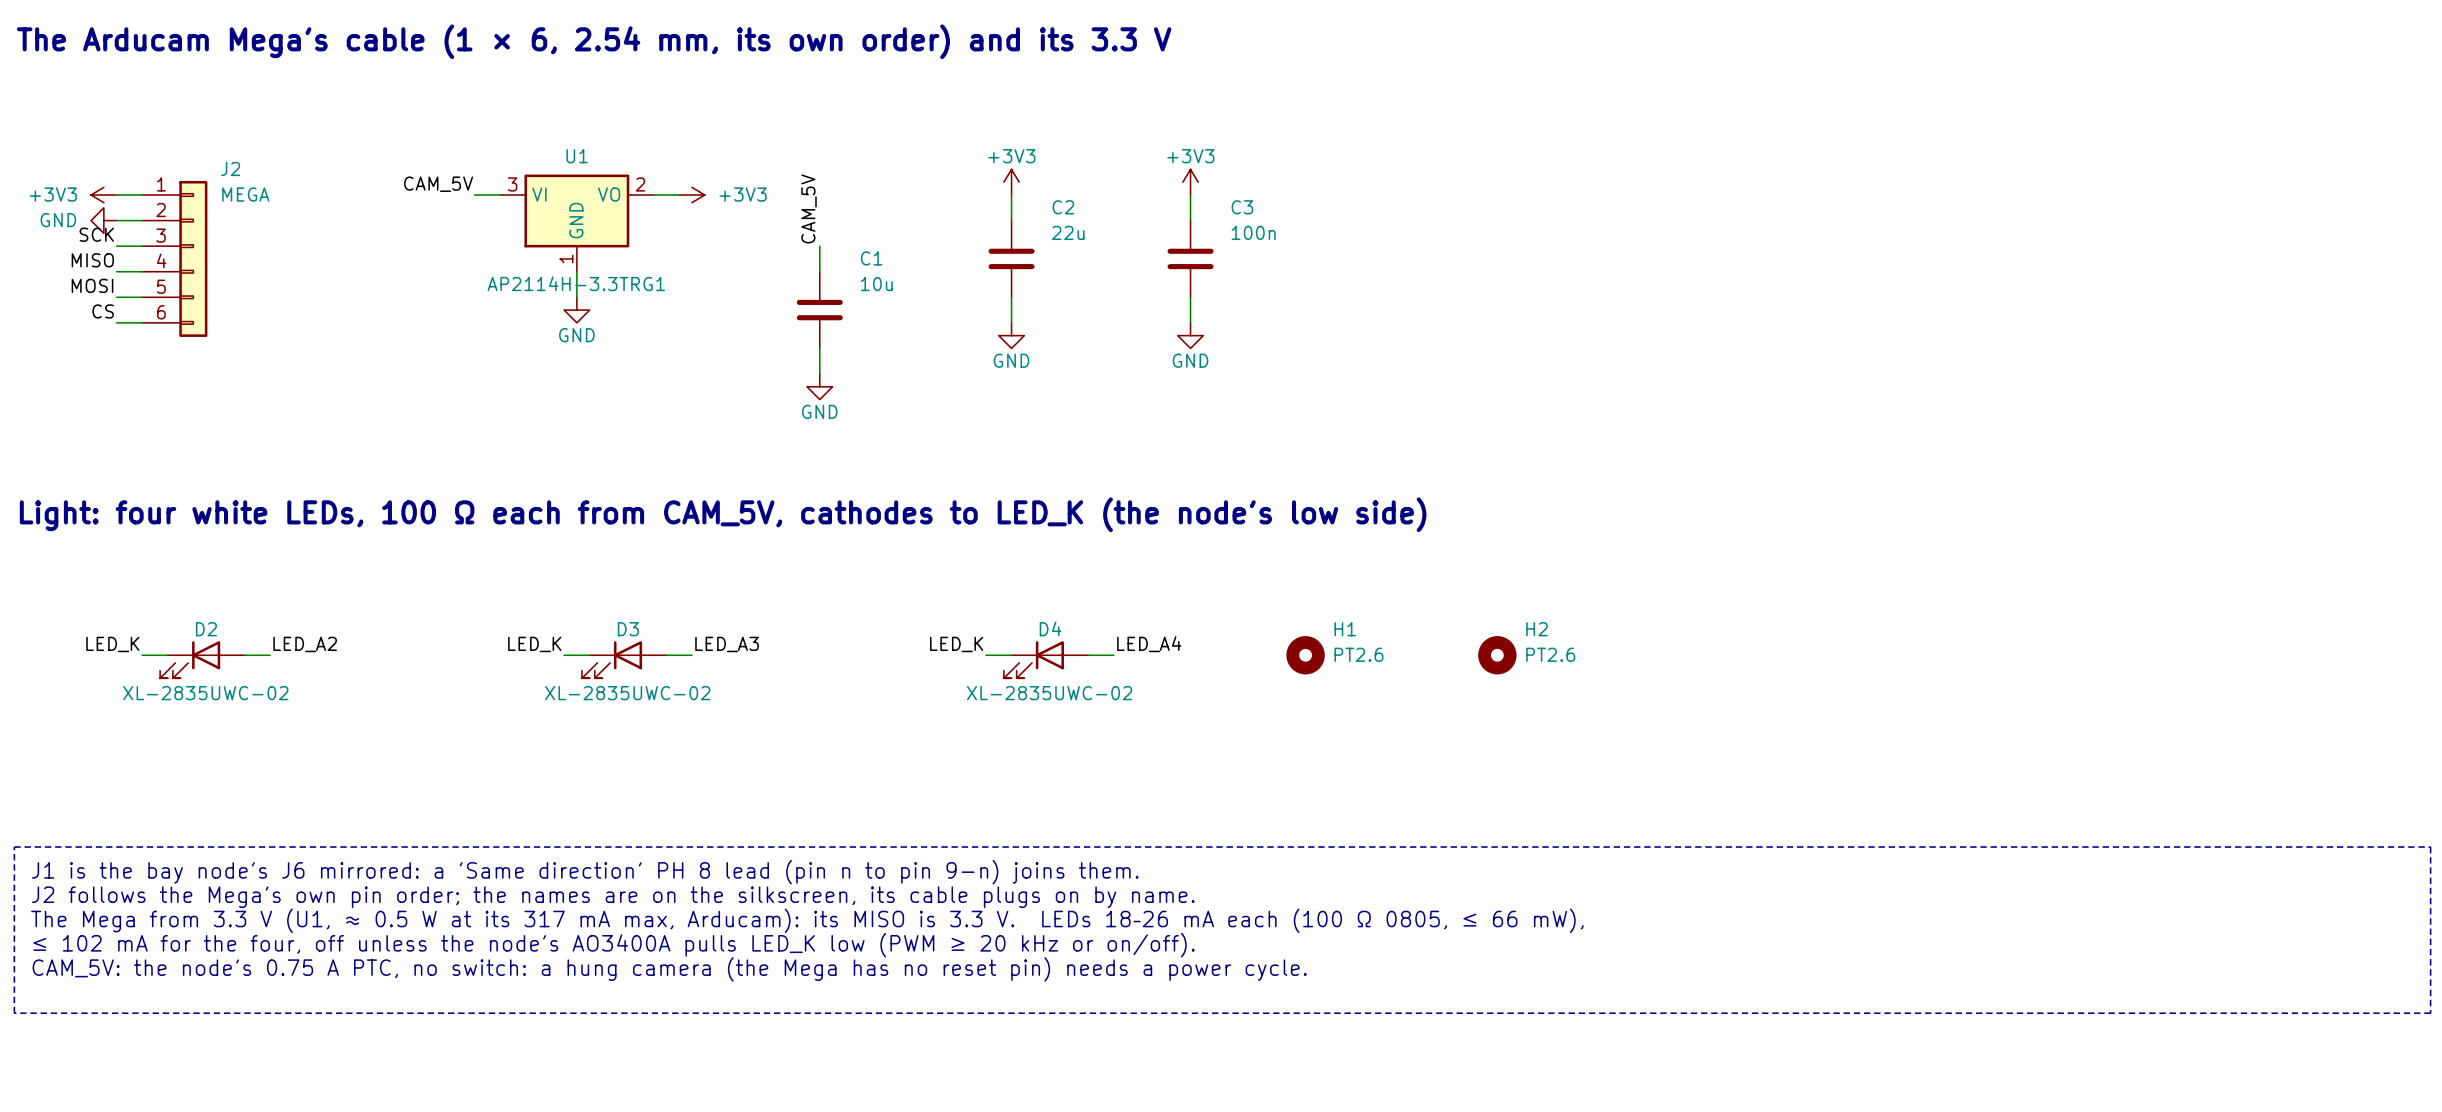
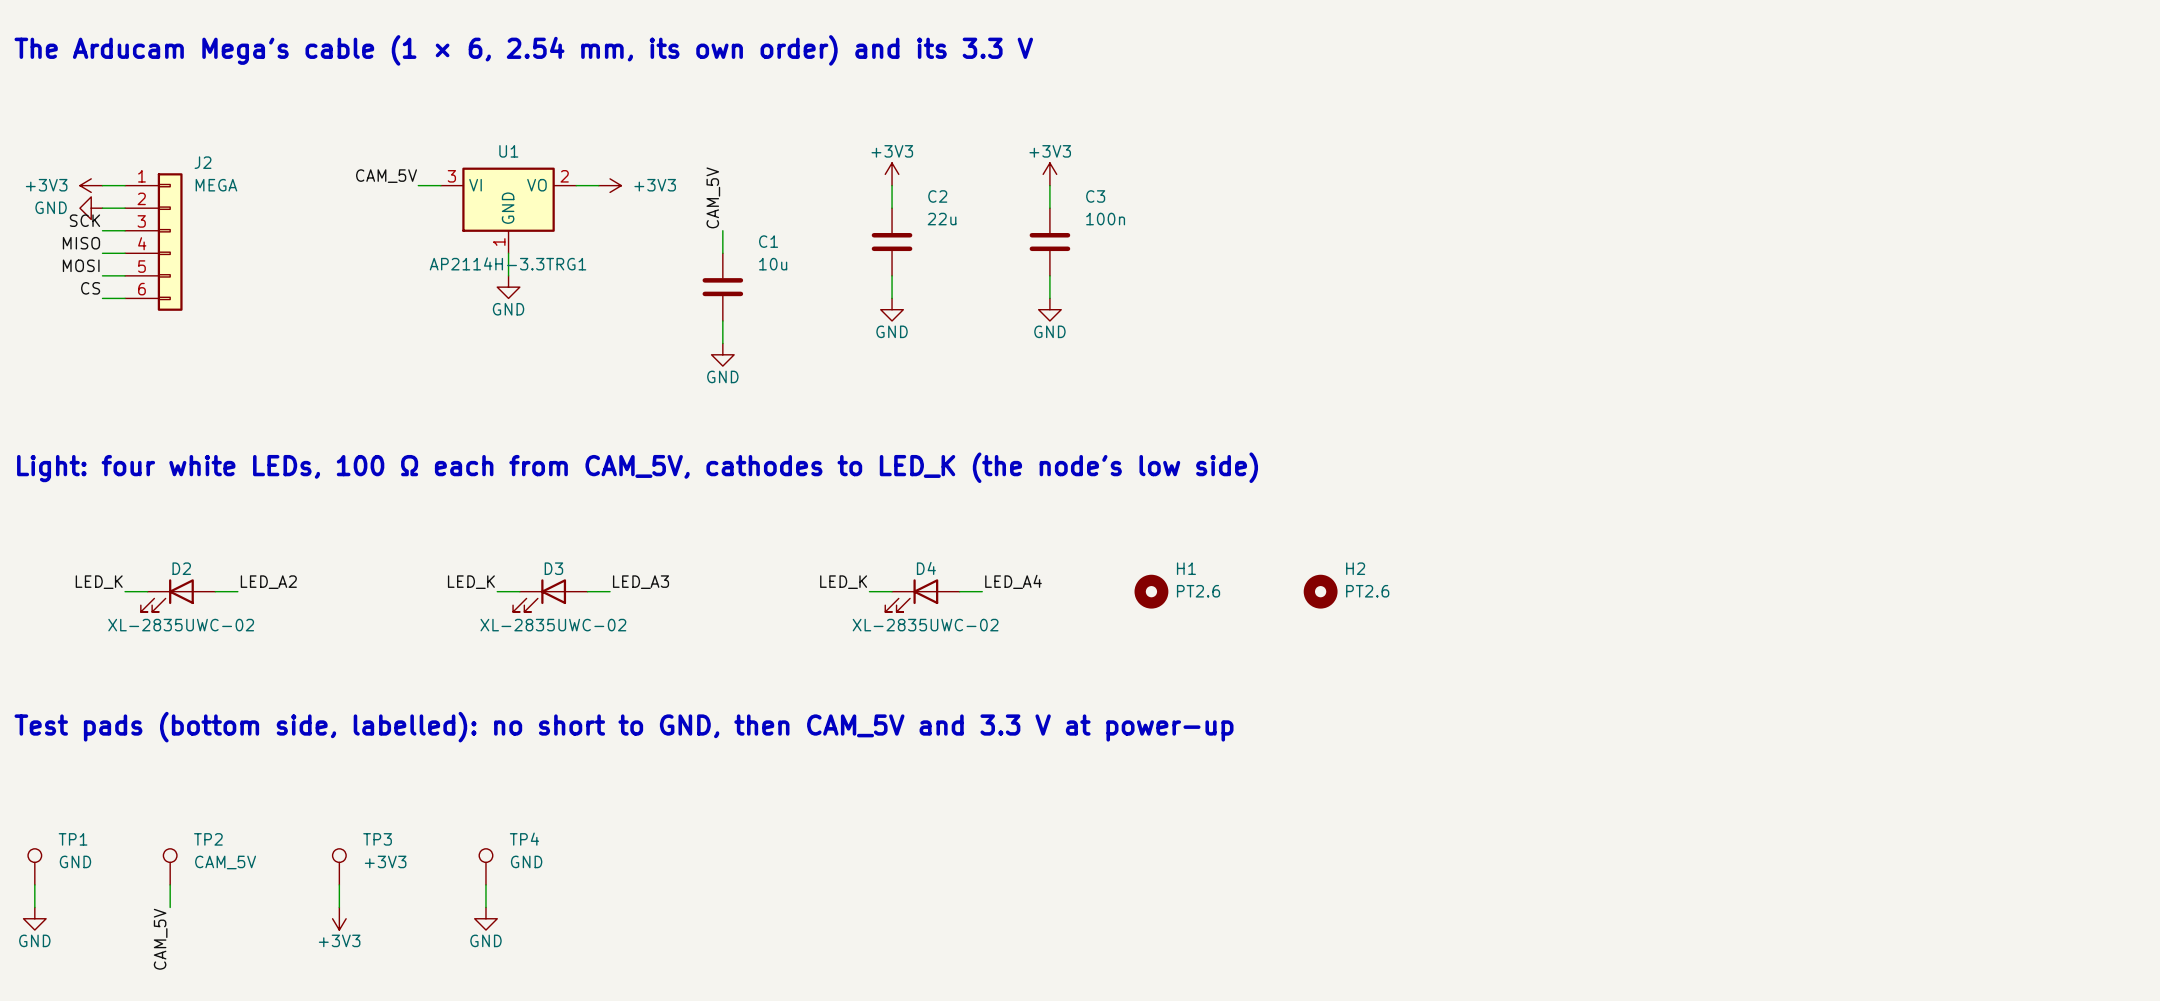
text: none -> Test pads (bottom side, labelled): no short to GND, then CAM_5V and 3.3 V at power-up (624, 727)
line: (14, 847) (2430, 847) (2430, 1013) (14, 1013) (14, 847) -> none
text: J1 is the bay node's J6 mirrored: a 'Same direction' PH 8 lead (pin n to pin 9−n) joins them. (585, 872) -> none
text: J2 follows the Mega's own pin order; the names are on the silkscreen, its cable plugs on by name. (613, 897) -> none
text: The Mega from 3.3 V (U1, ≈ 0.5 W at its 317 mA max, Arducam): its MISO is 3.3 V. LEDs 18–26 mA each (100 Ω 0805, ≤ 66 mW), (807, 920) -> none
text: ≤ 102 mA for the four, off unless the node's AO3400A pulls LED_K low (PWM ≥ 20 kHz or on/off). (613, 945) -> none
TP1: none -> GND (34, 866)
TP2: none -> CAM_5V (170, 866)
TP3: none -> +3V3 (339, 866)
TP4: none -> GND (485, 866)
text: CAM_5V: the node's 0.75 A PTC, no switch: a hung camera (the Mega has no reset pin) needs a power cycle. (669, 969) -> none
wire: none -> (34, 884) (34, 907)
wire: none -> (170, 884) (170, 907)
wire: none -> (339, 884) (339, 907)
wire: none -> (485, 884) (485, 907)
power symbol: none -> GND (34, 918)
power symbol: none -> +3V3 (339, 918)
power symbol: none -> GND (485, 918)
label: none -> CAM_5V (160, 939)

